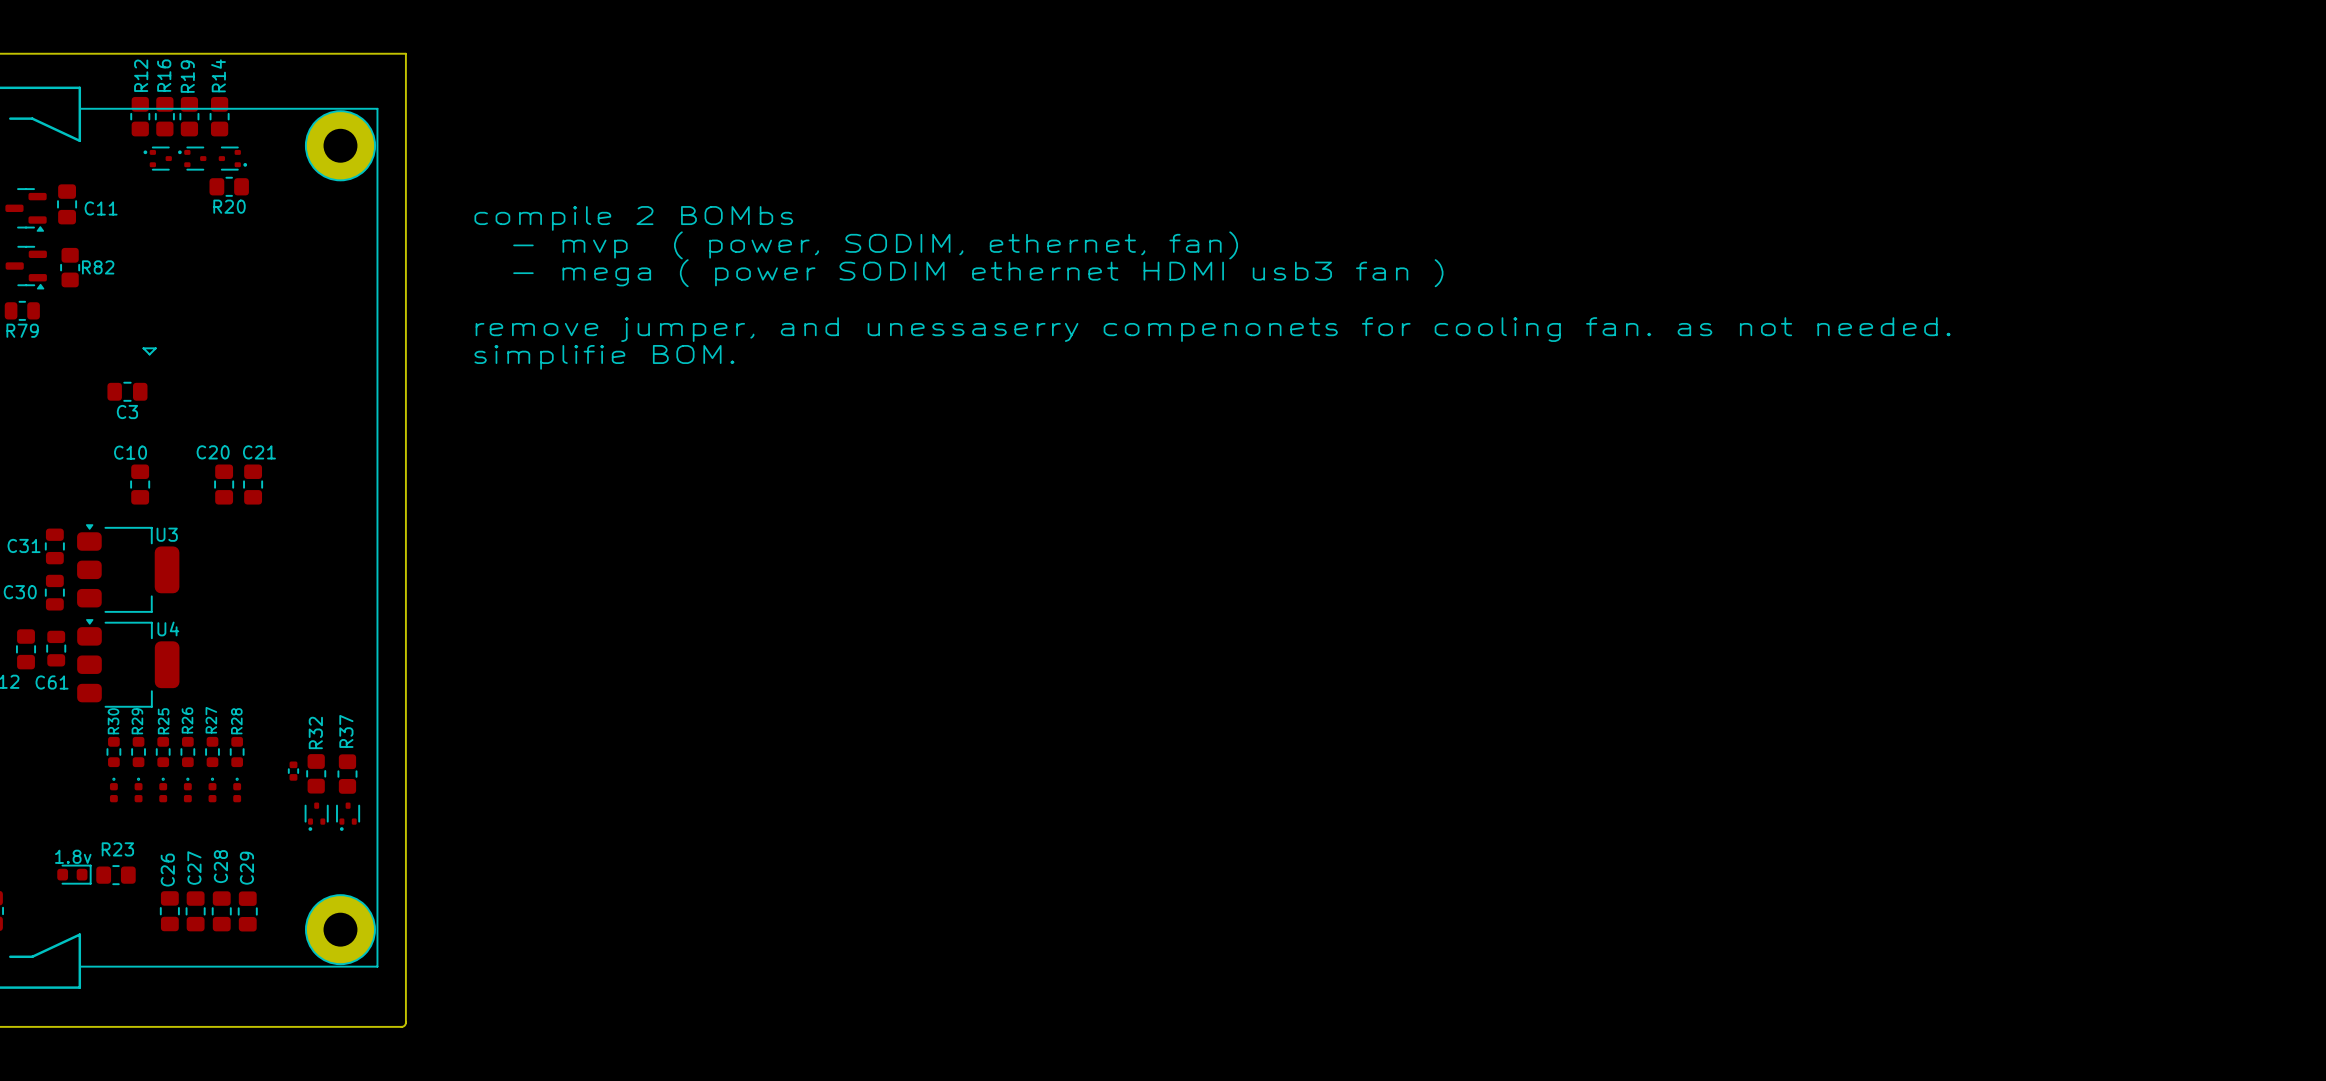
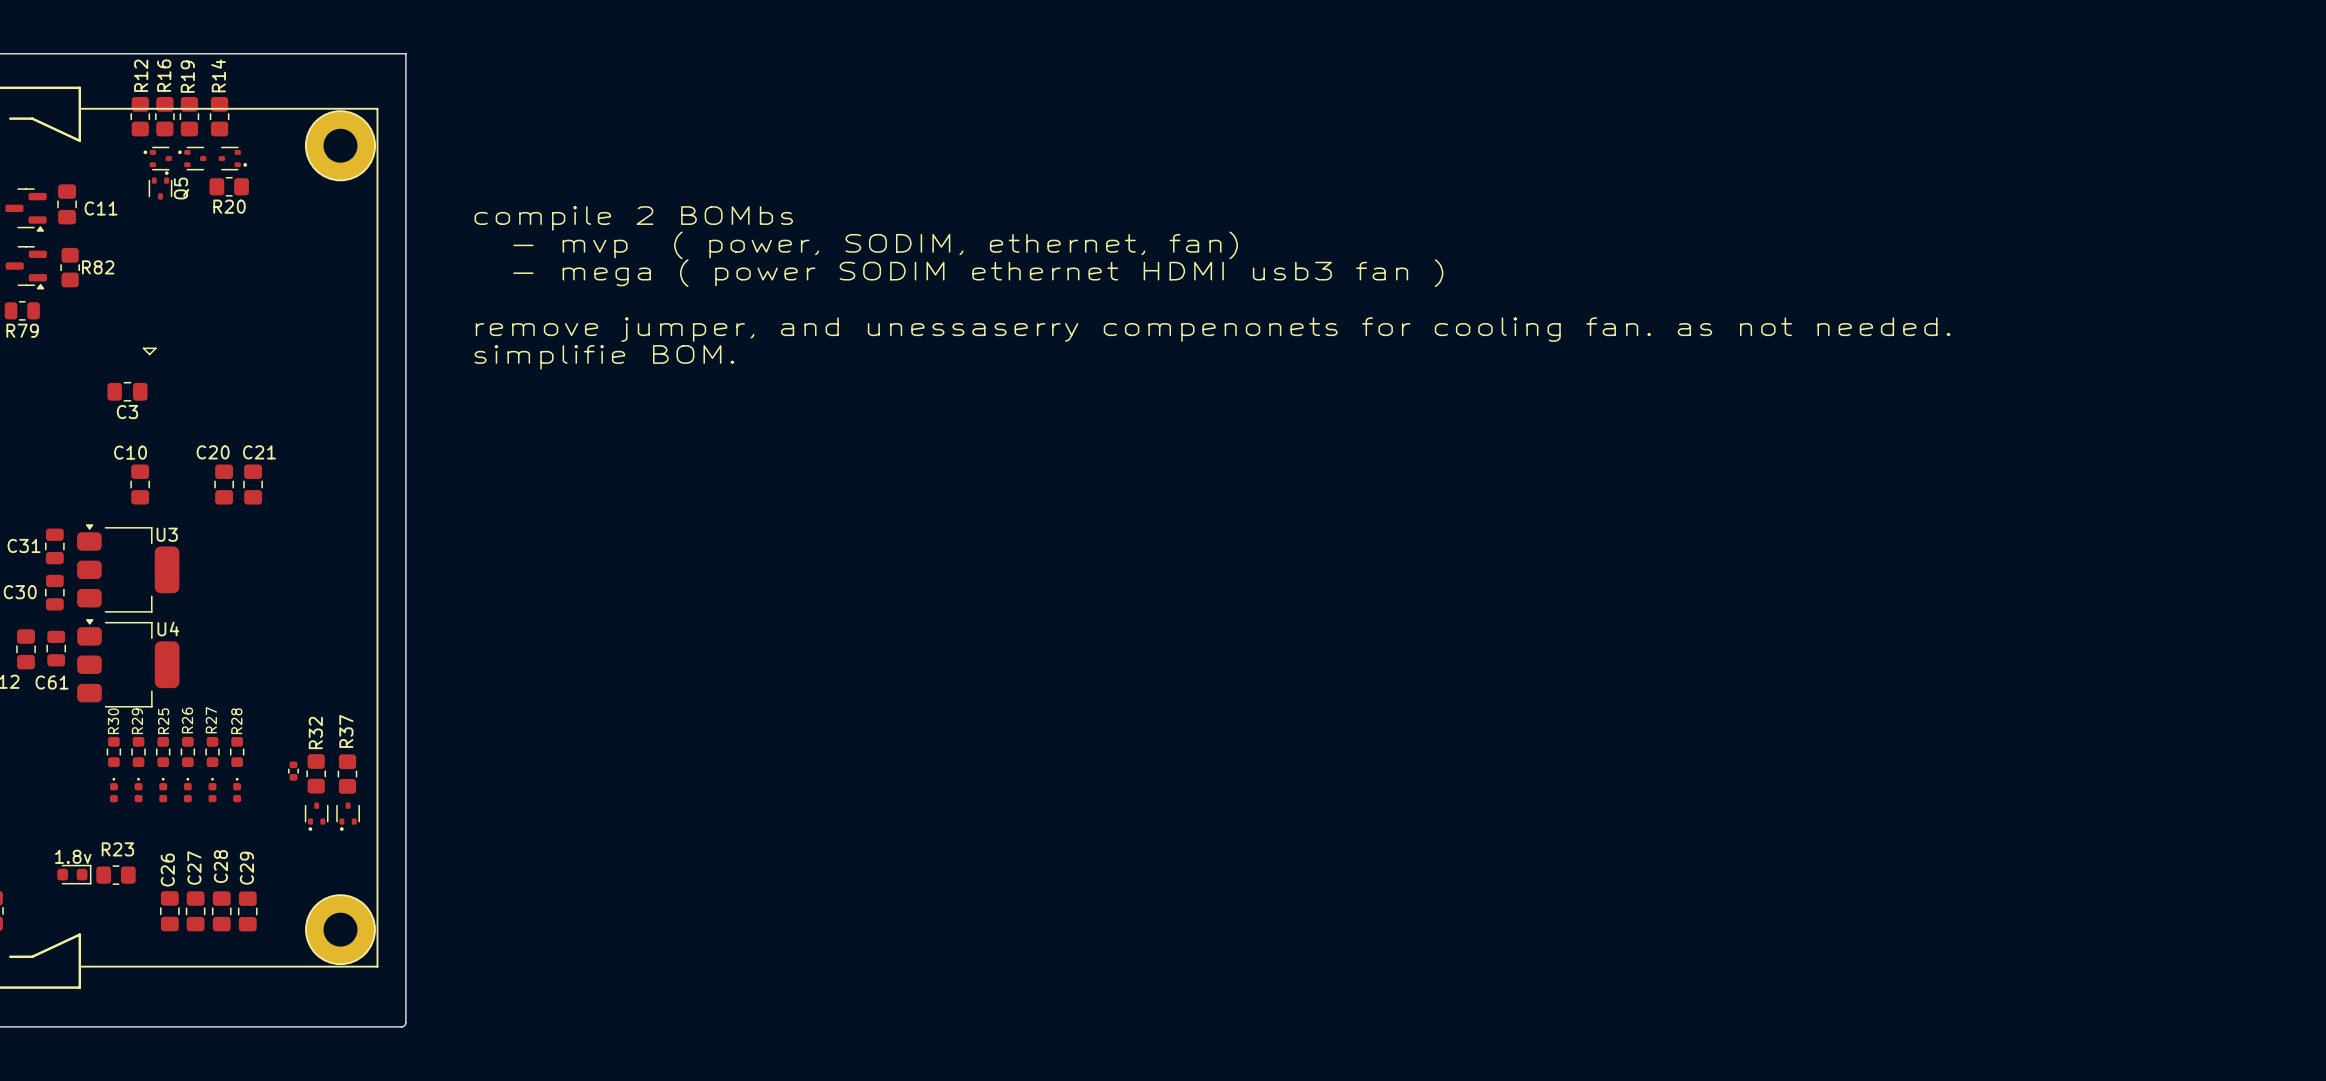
Q5: none -> (160, 185)

